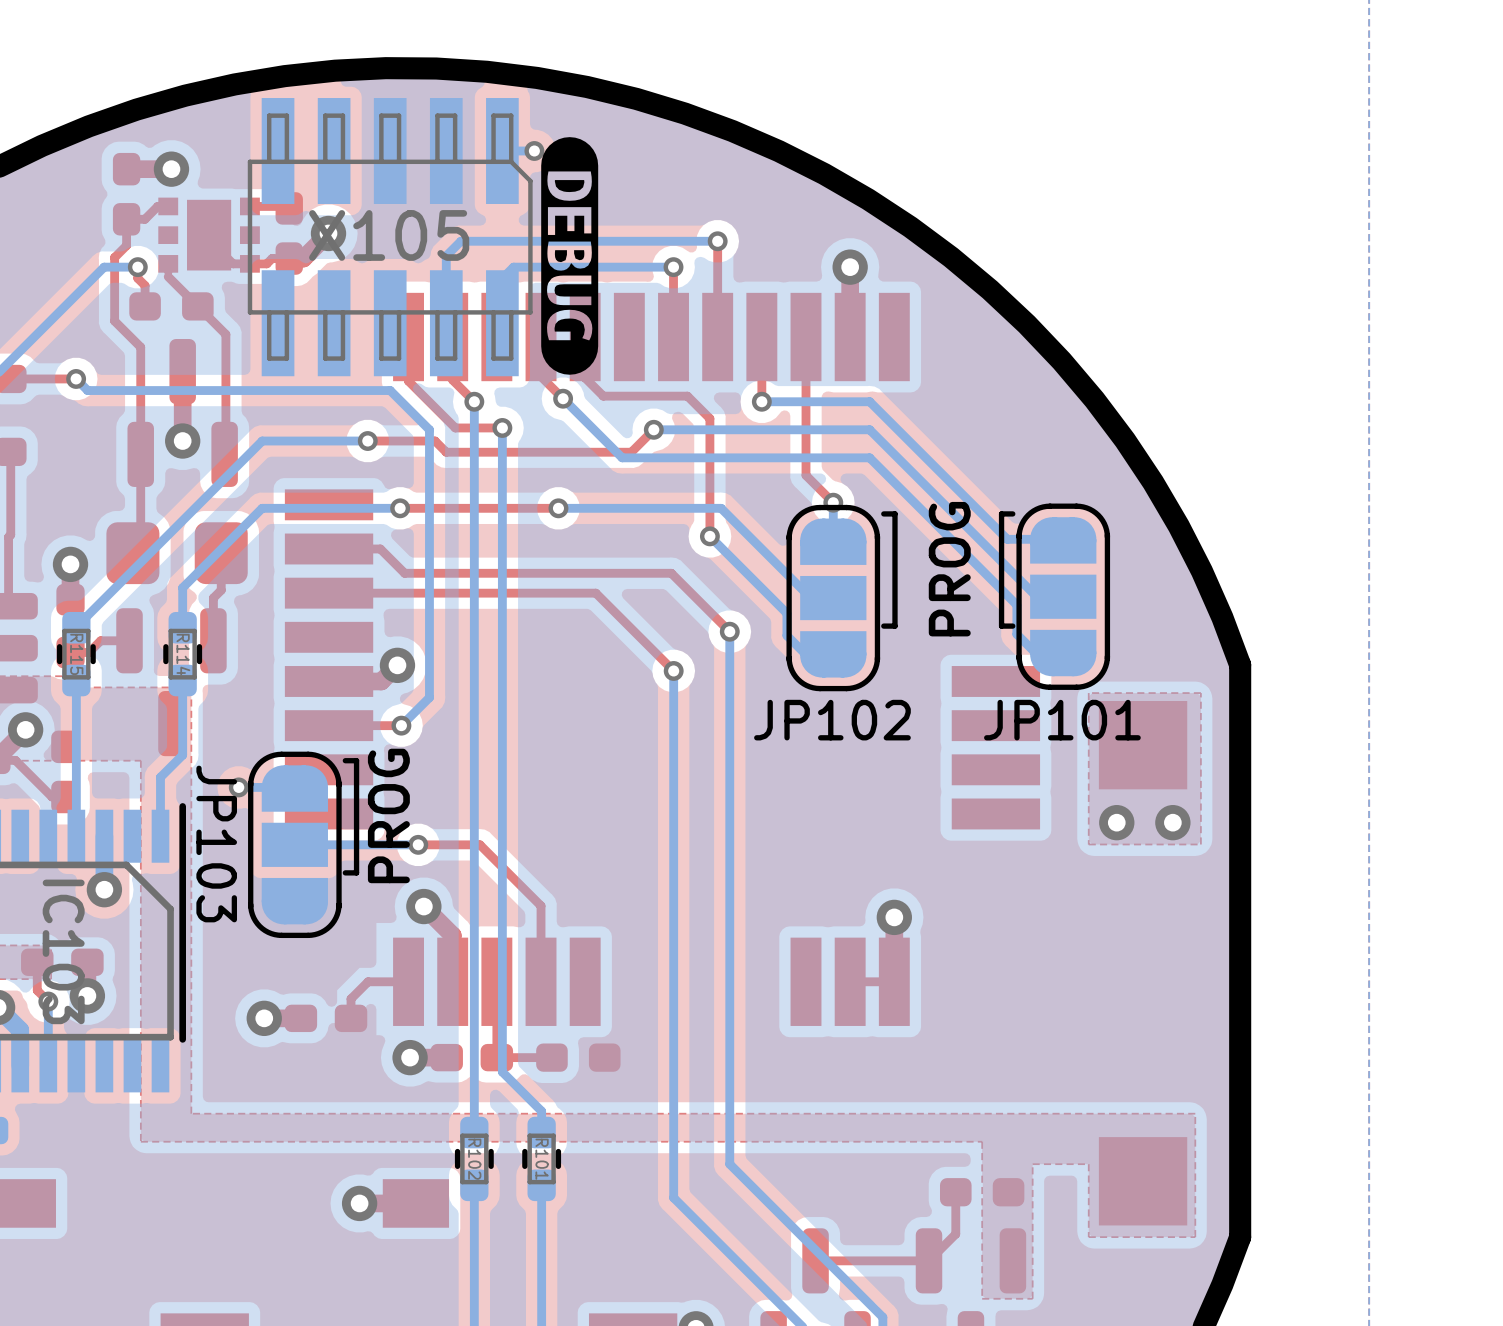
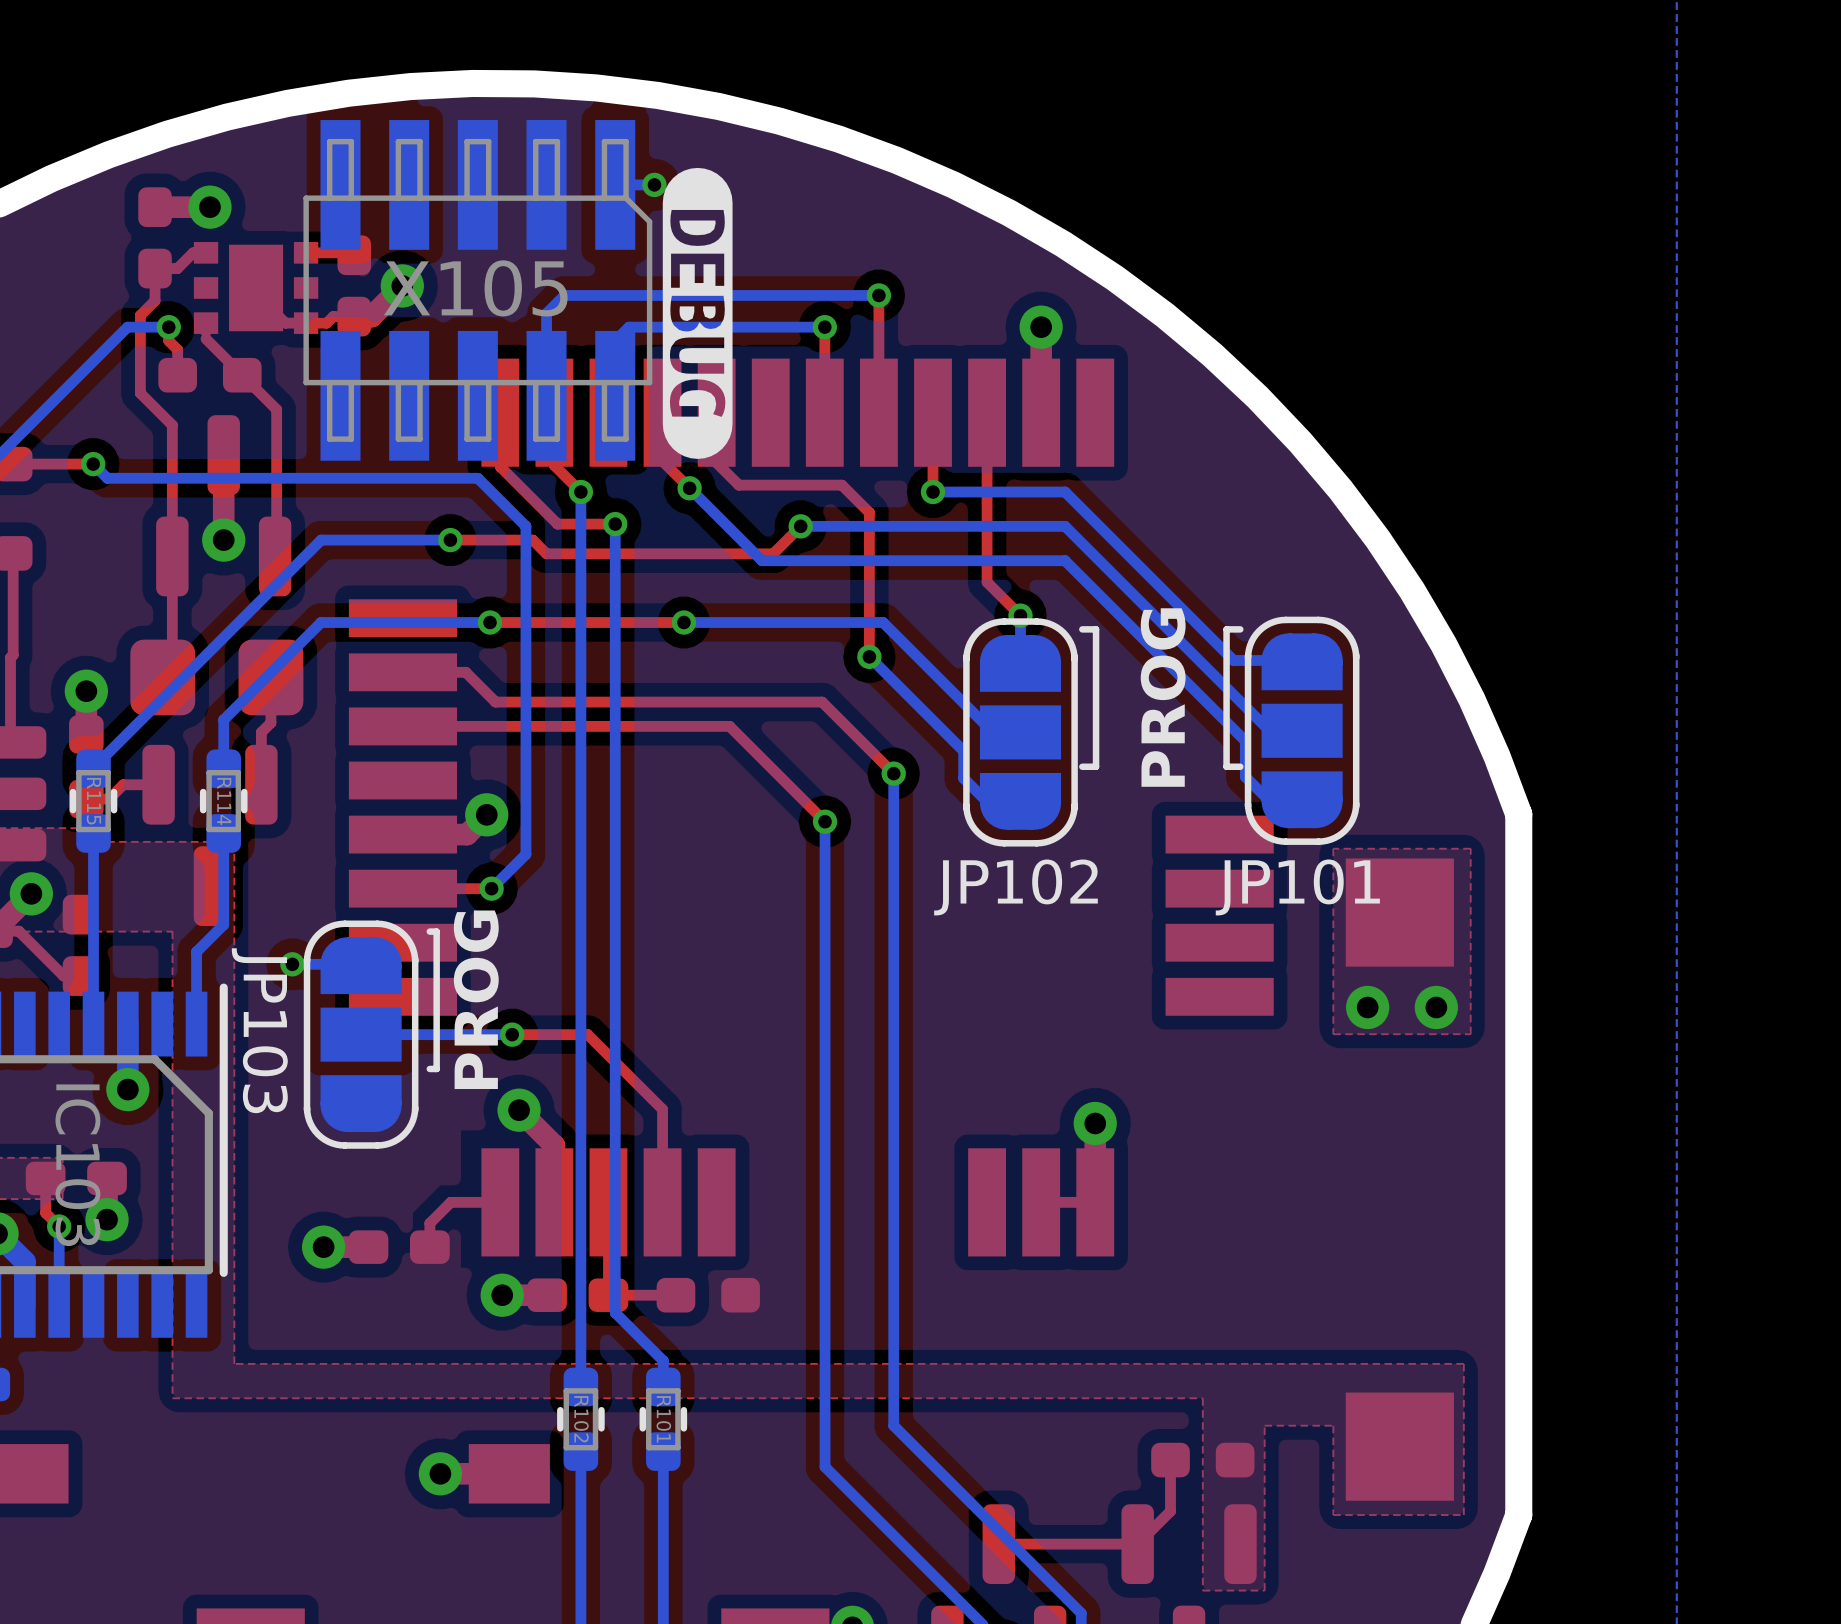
line: (350, 760) (345, 760) -> none
line: (350, 872) (345, 872) -> none

